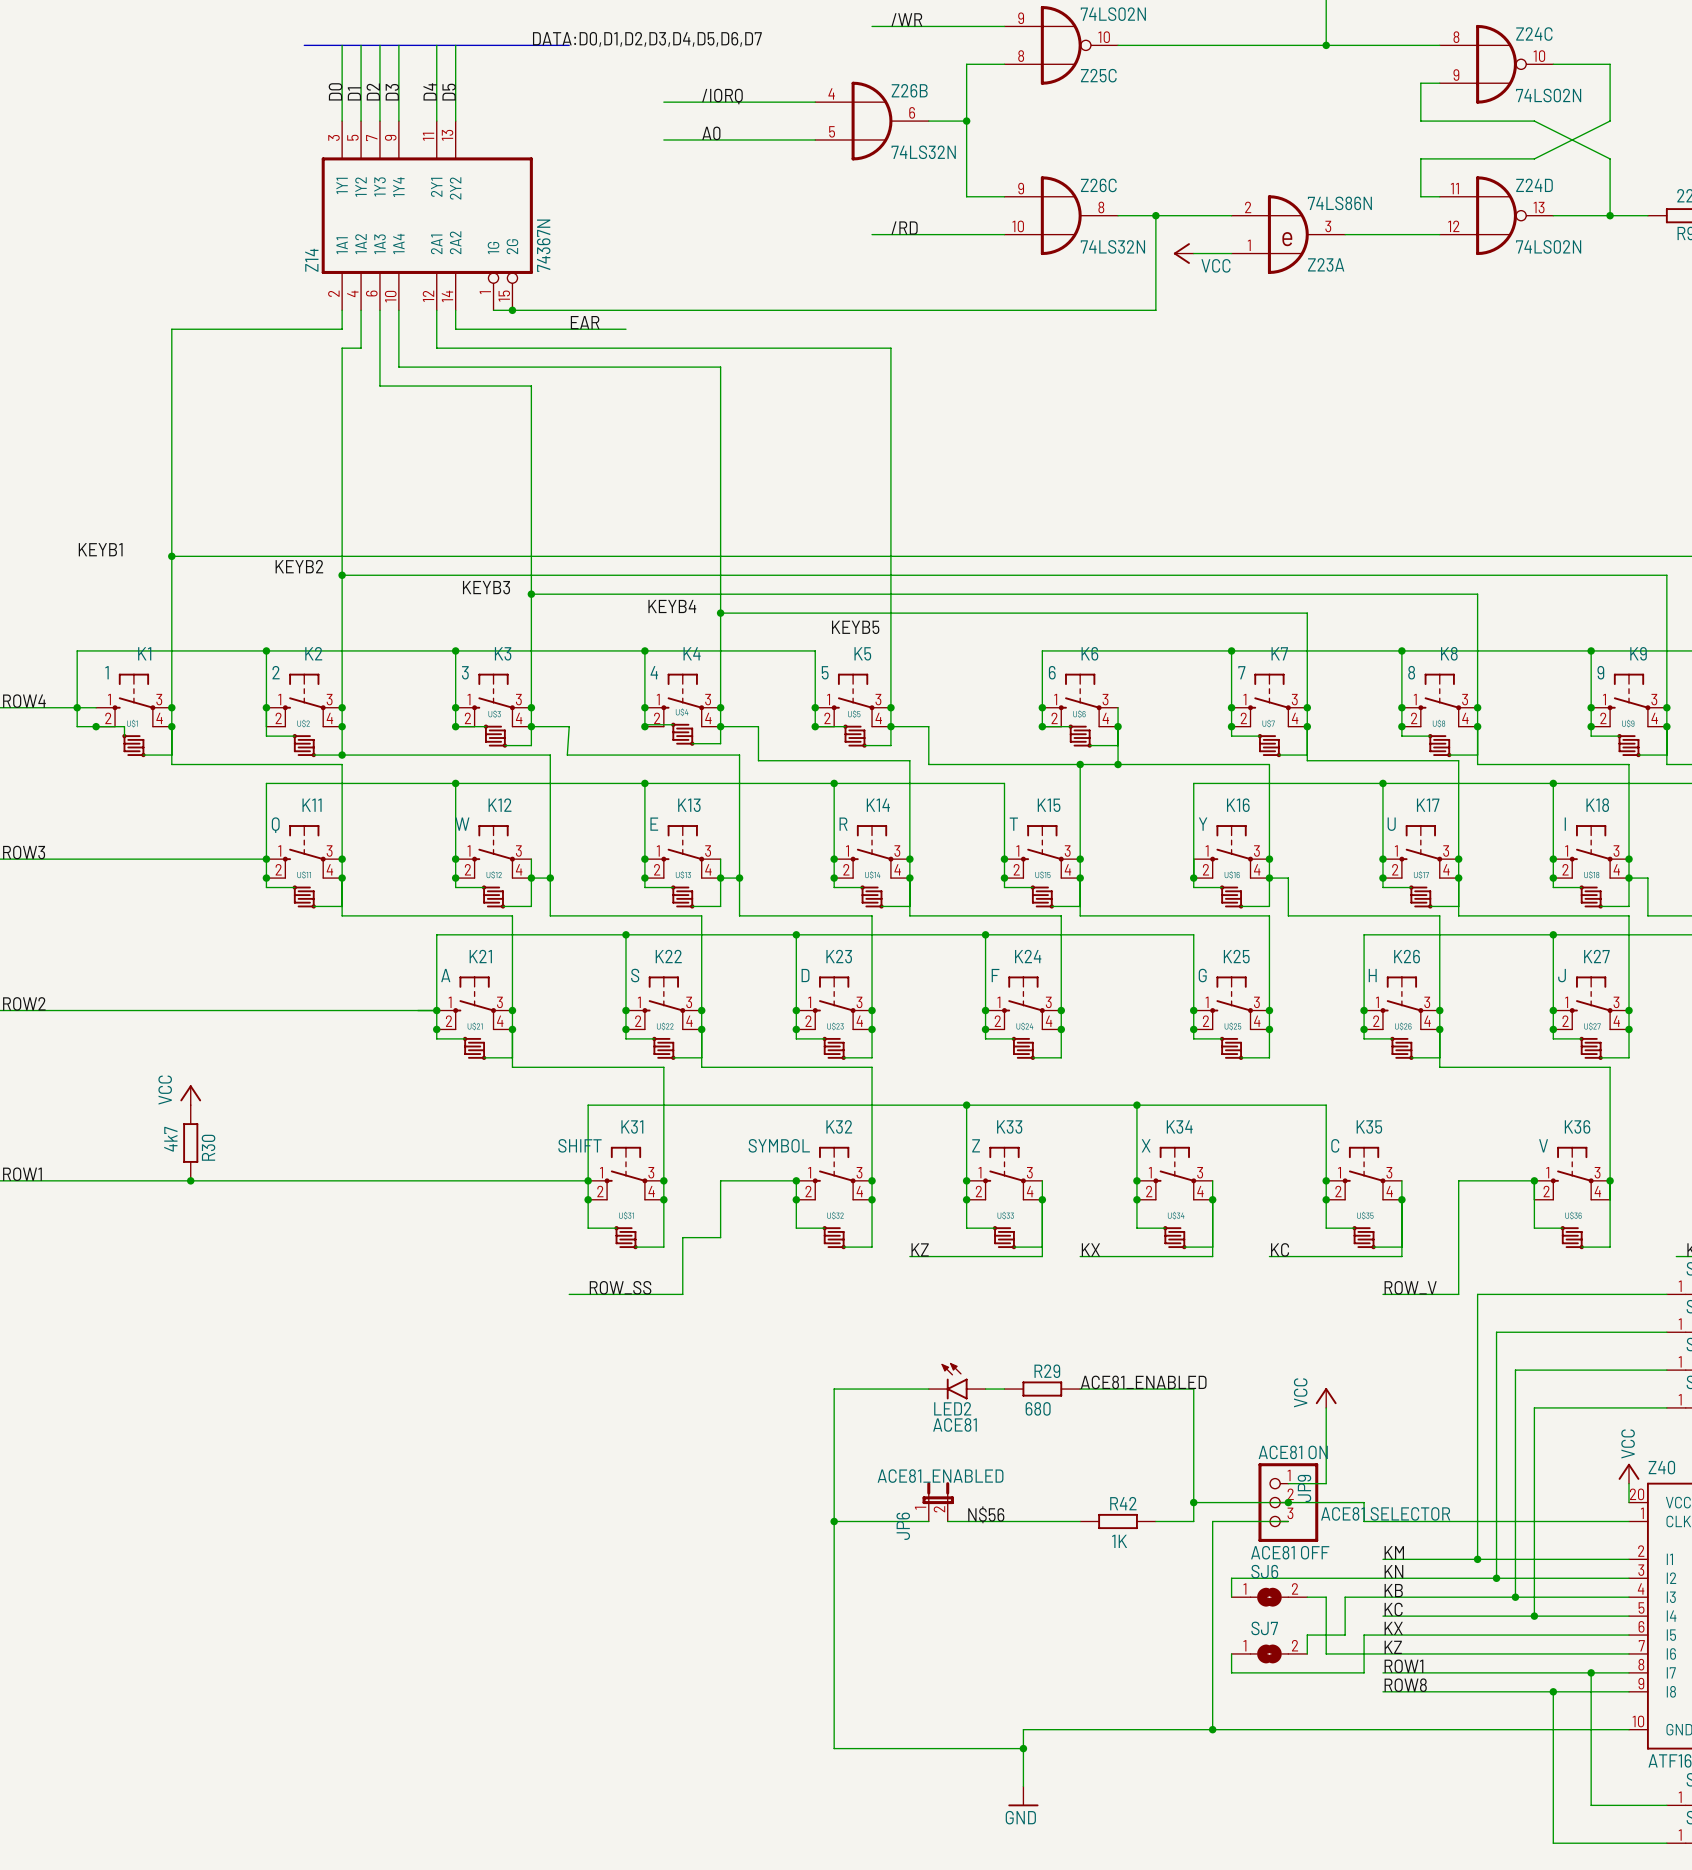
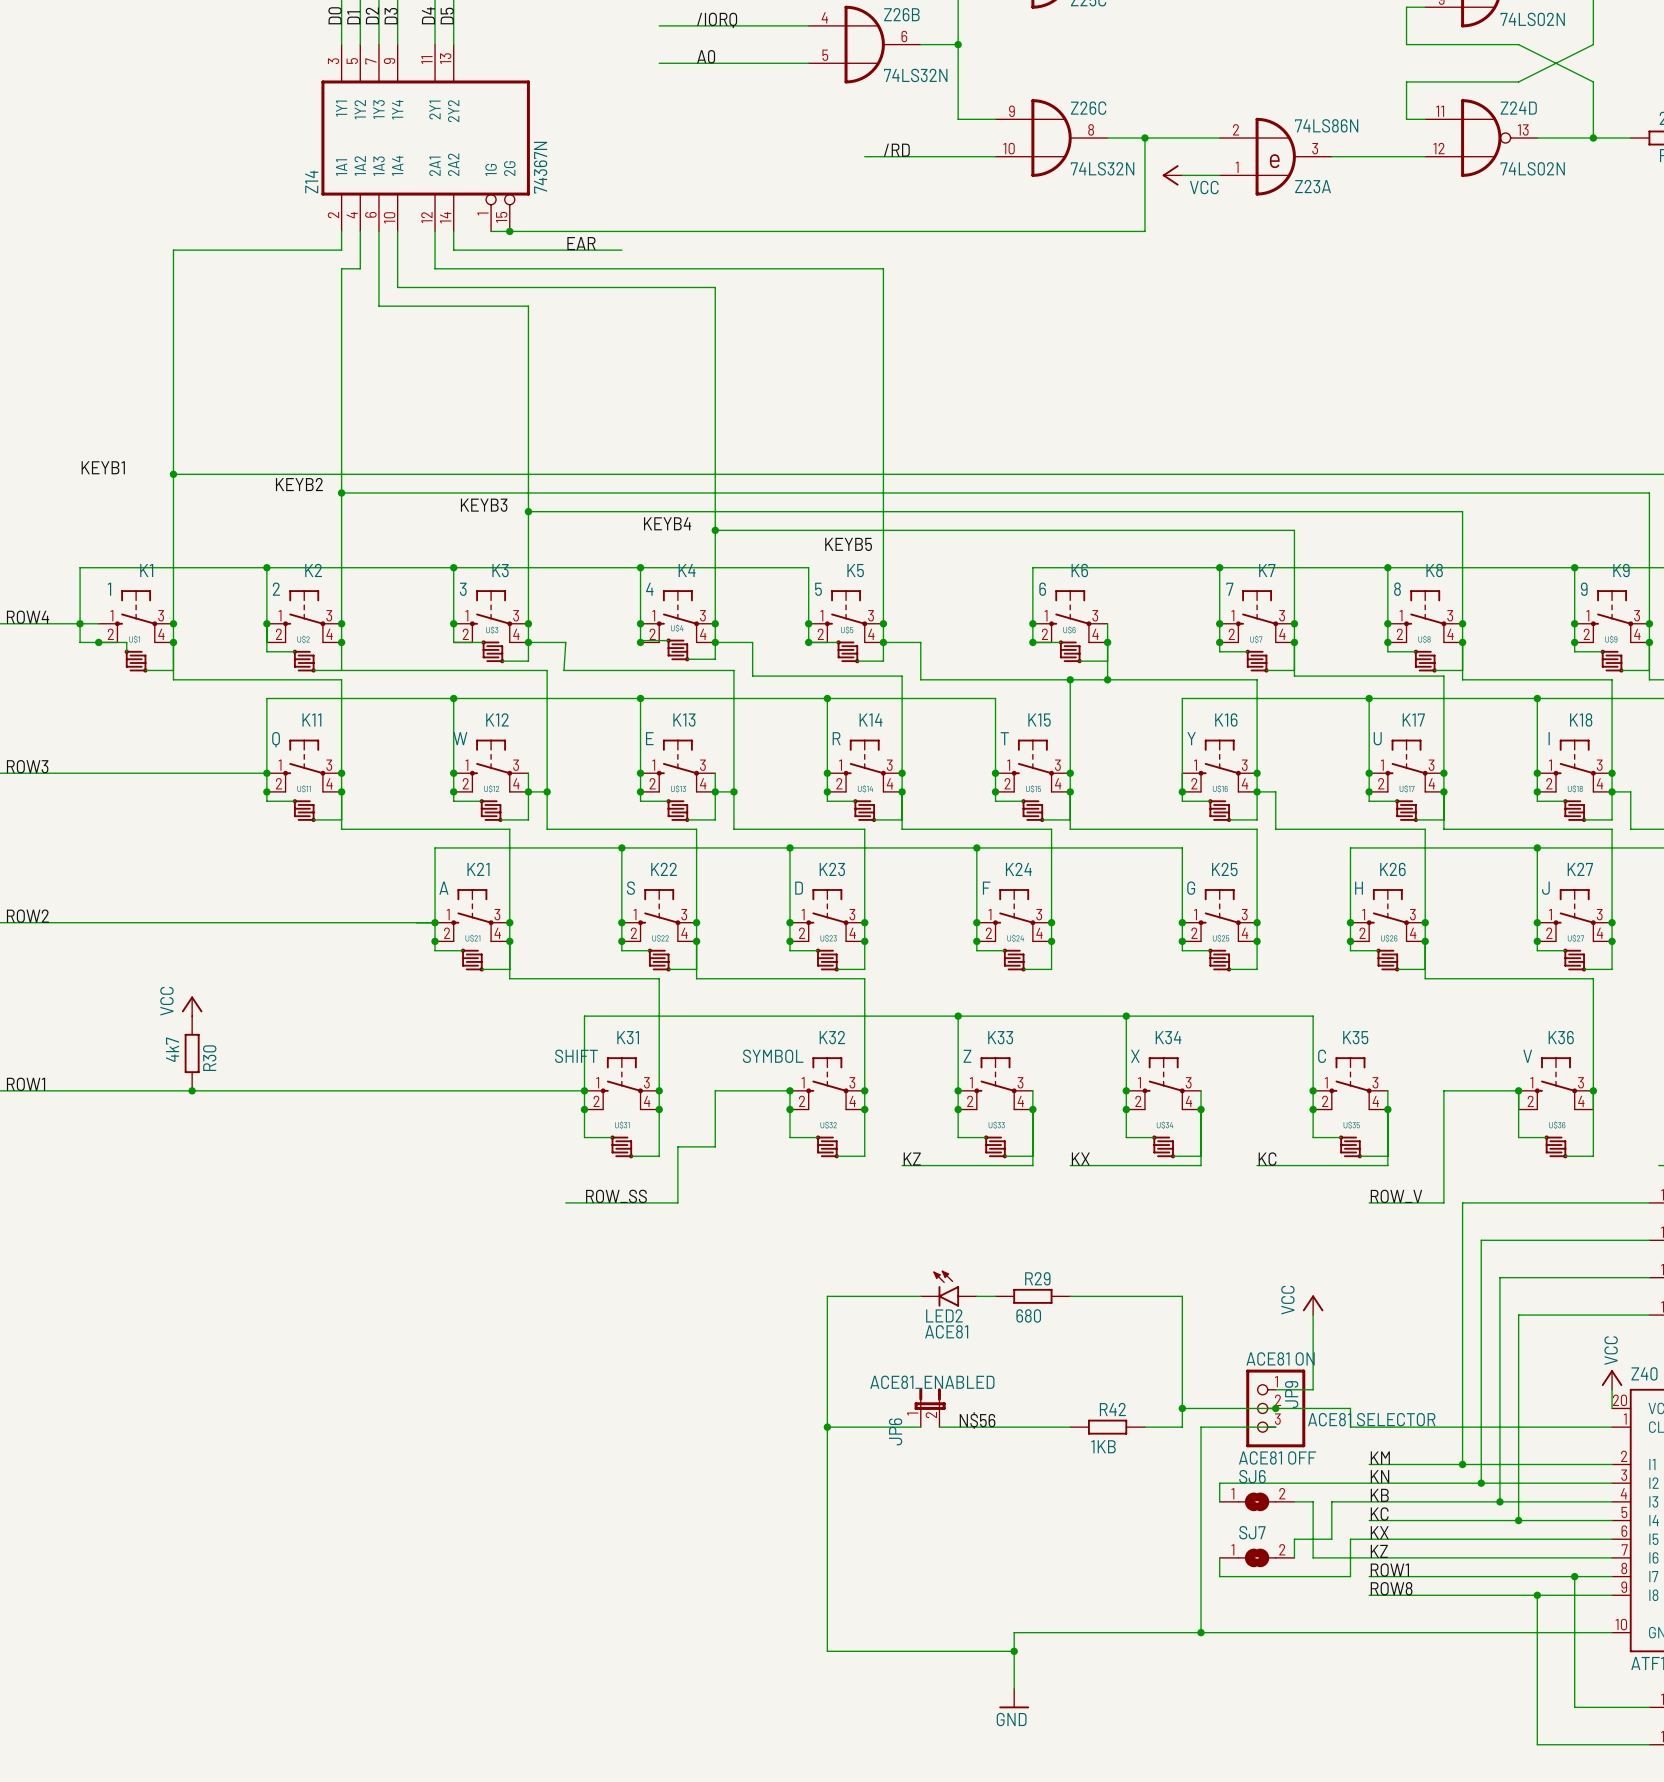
junction: (455, 726) -> none
junction: (342, 755) -> none
label: ACE81_ENABLED (1143, 1382) -> none
R42 value: 1K (1119, 1541) -> 1KB (1103, 1446)

